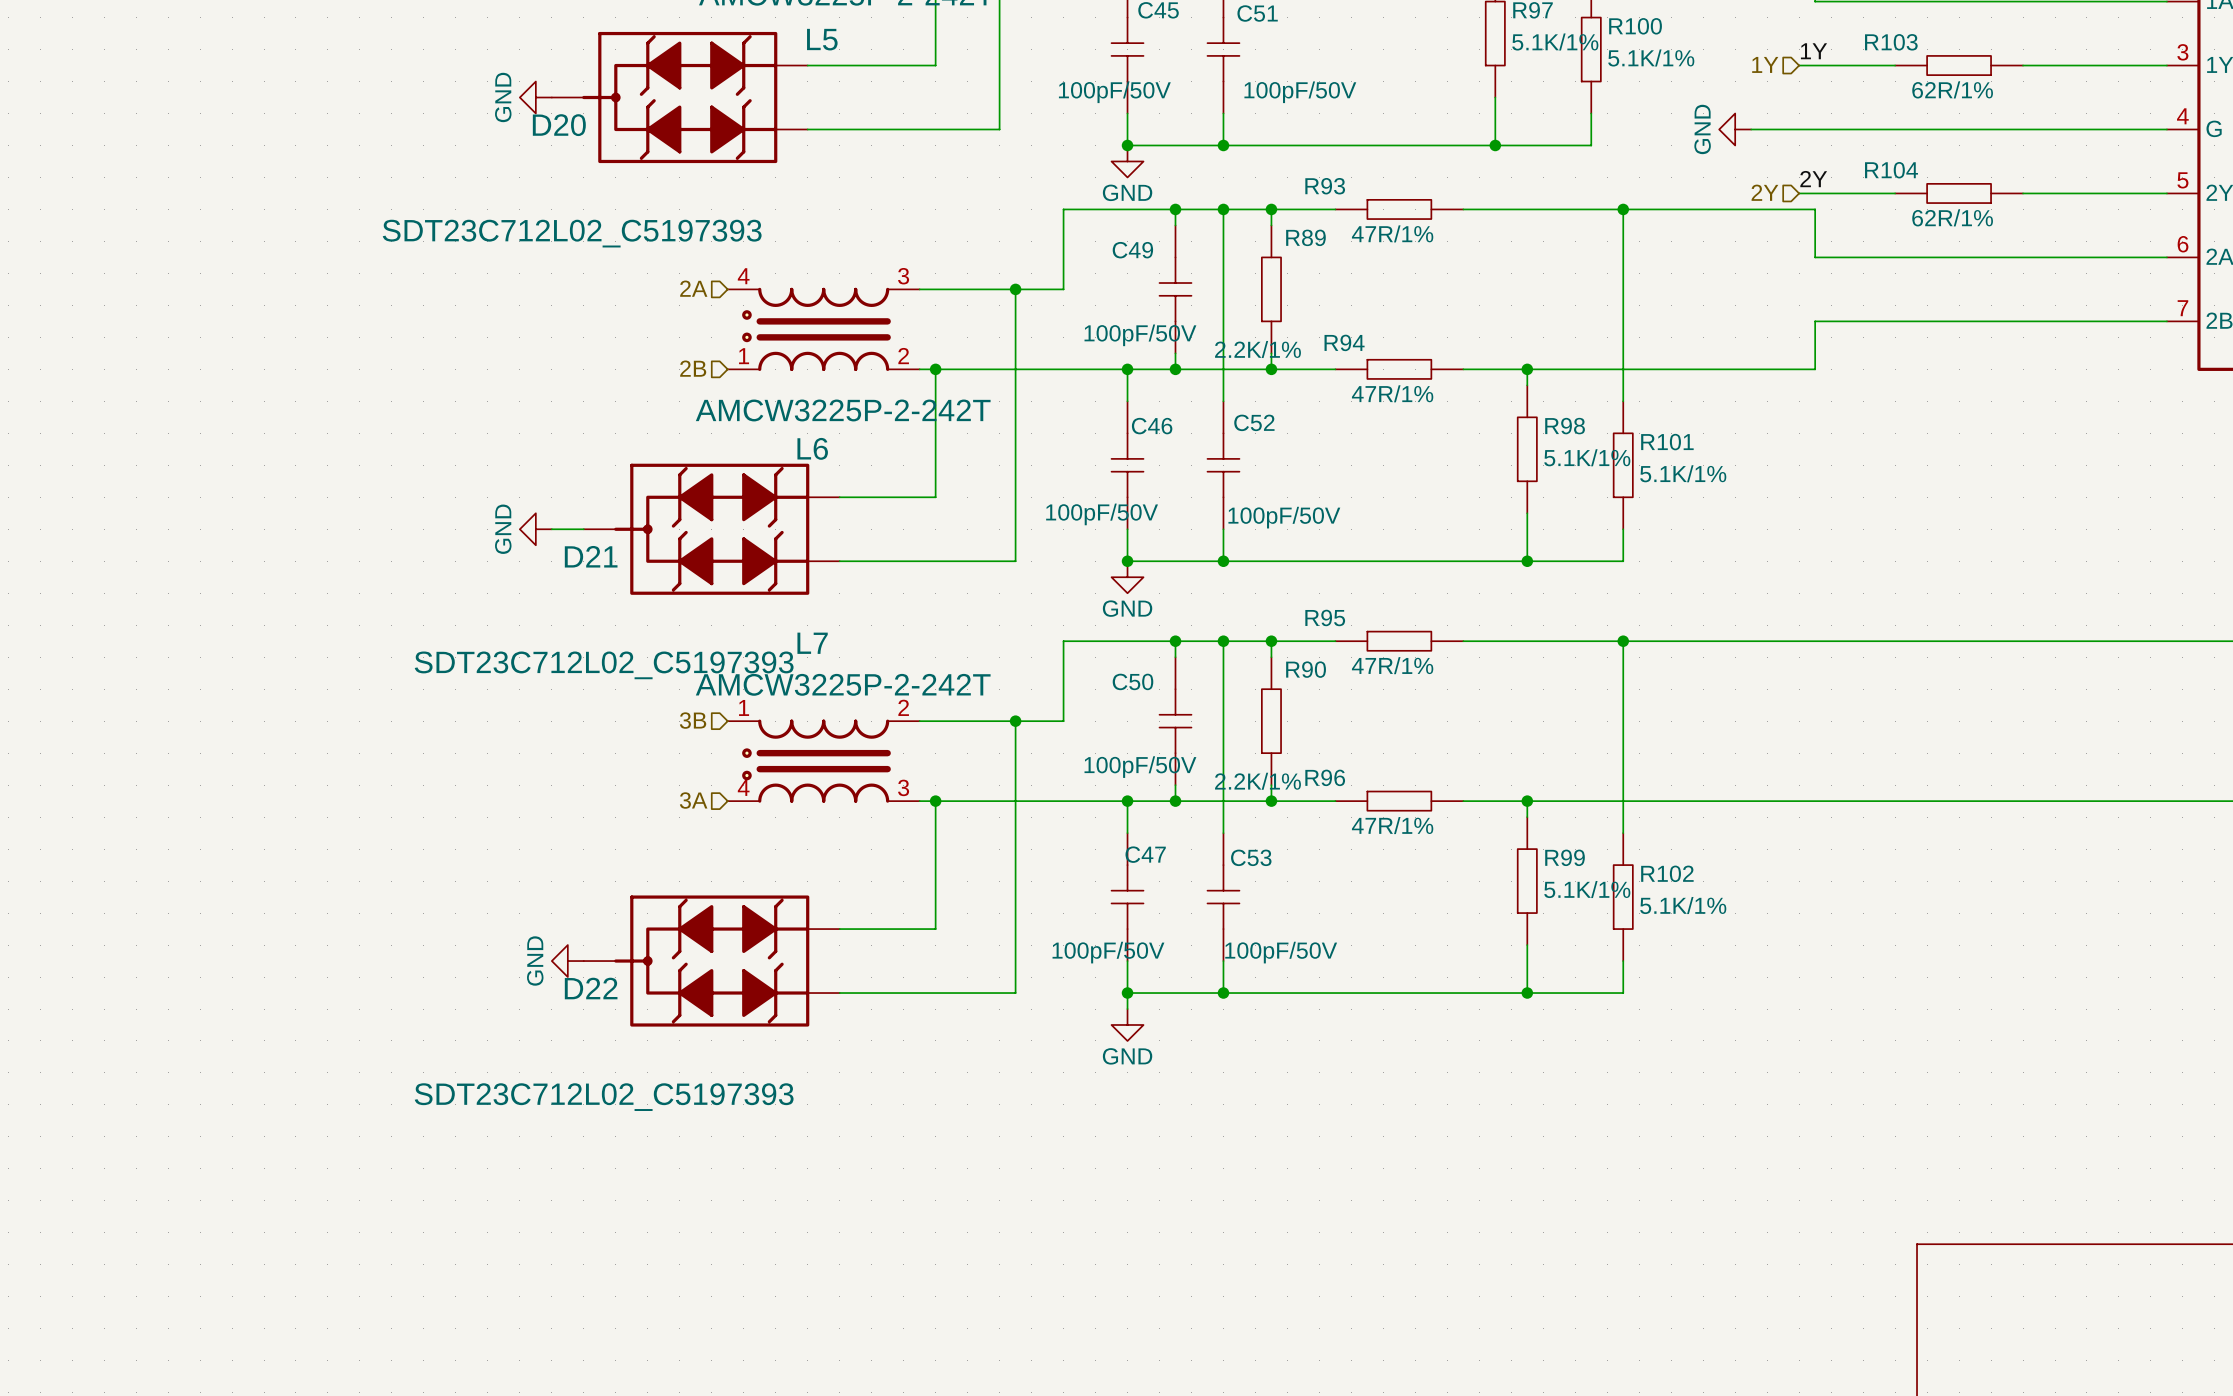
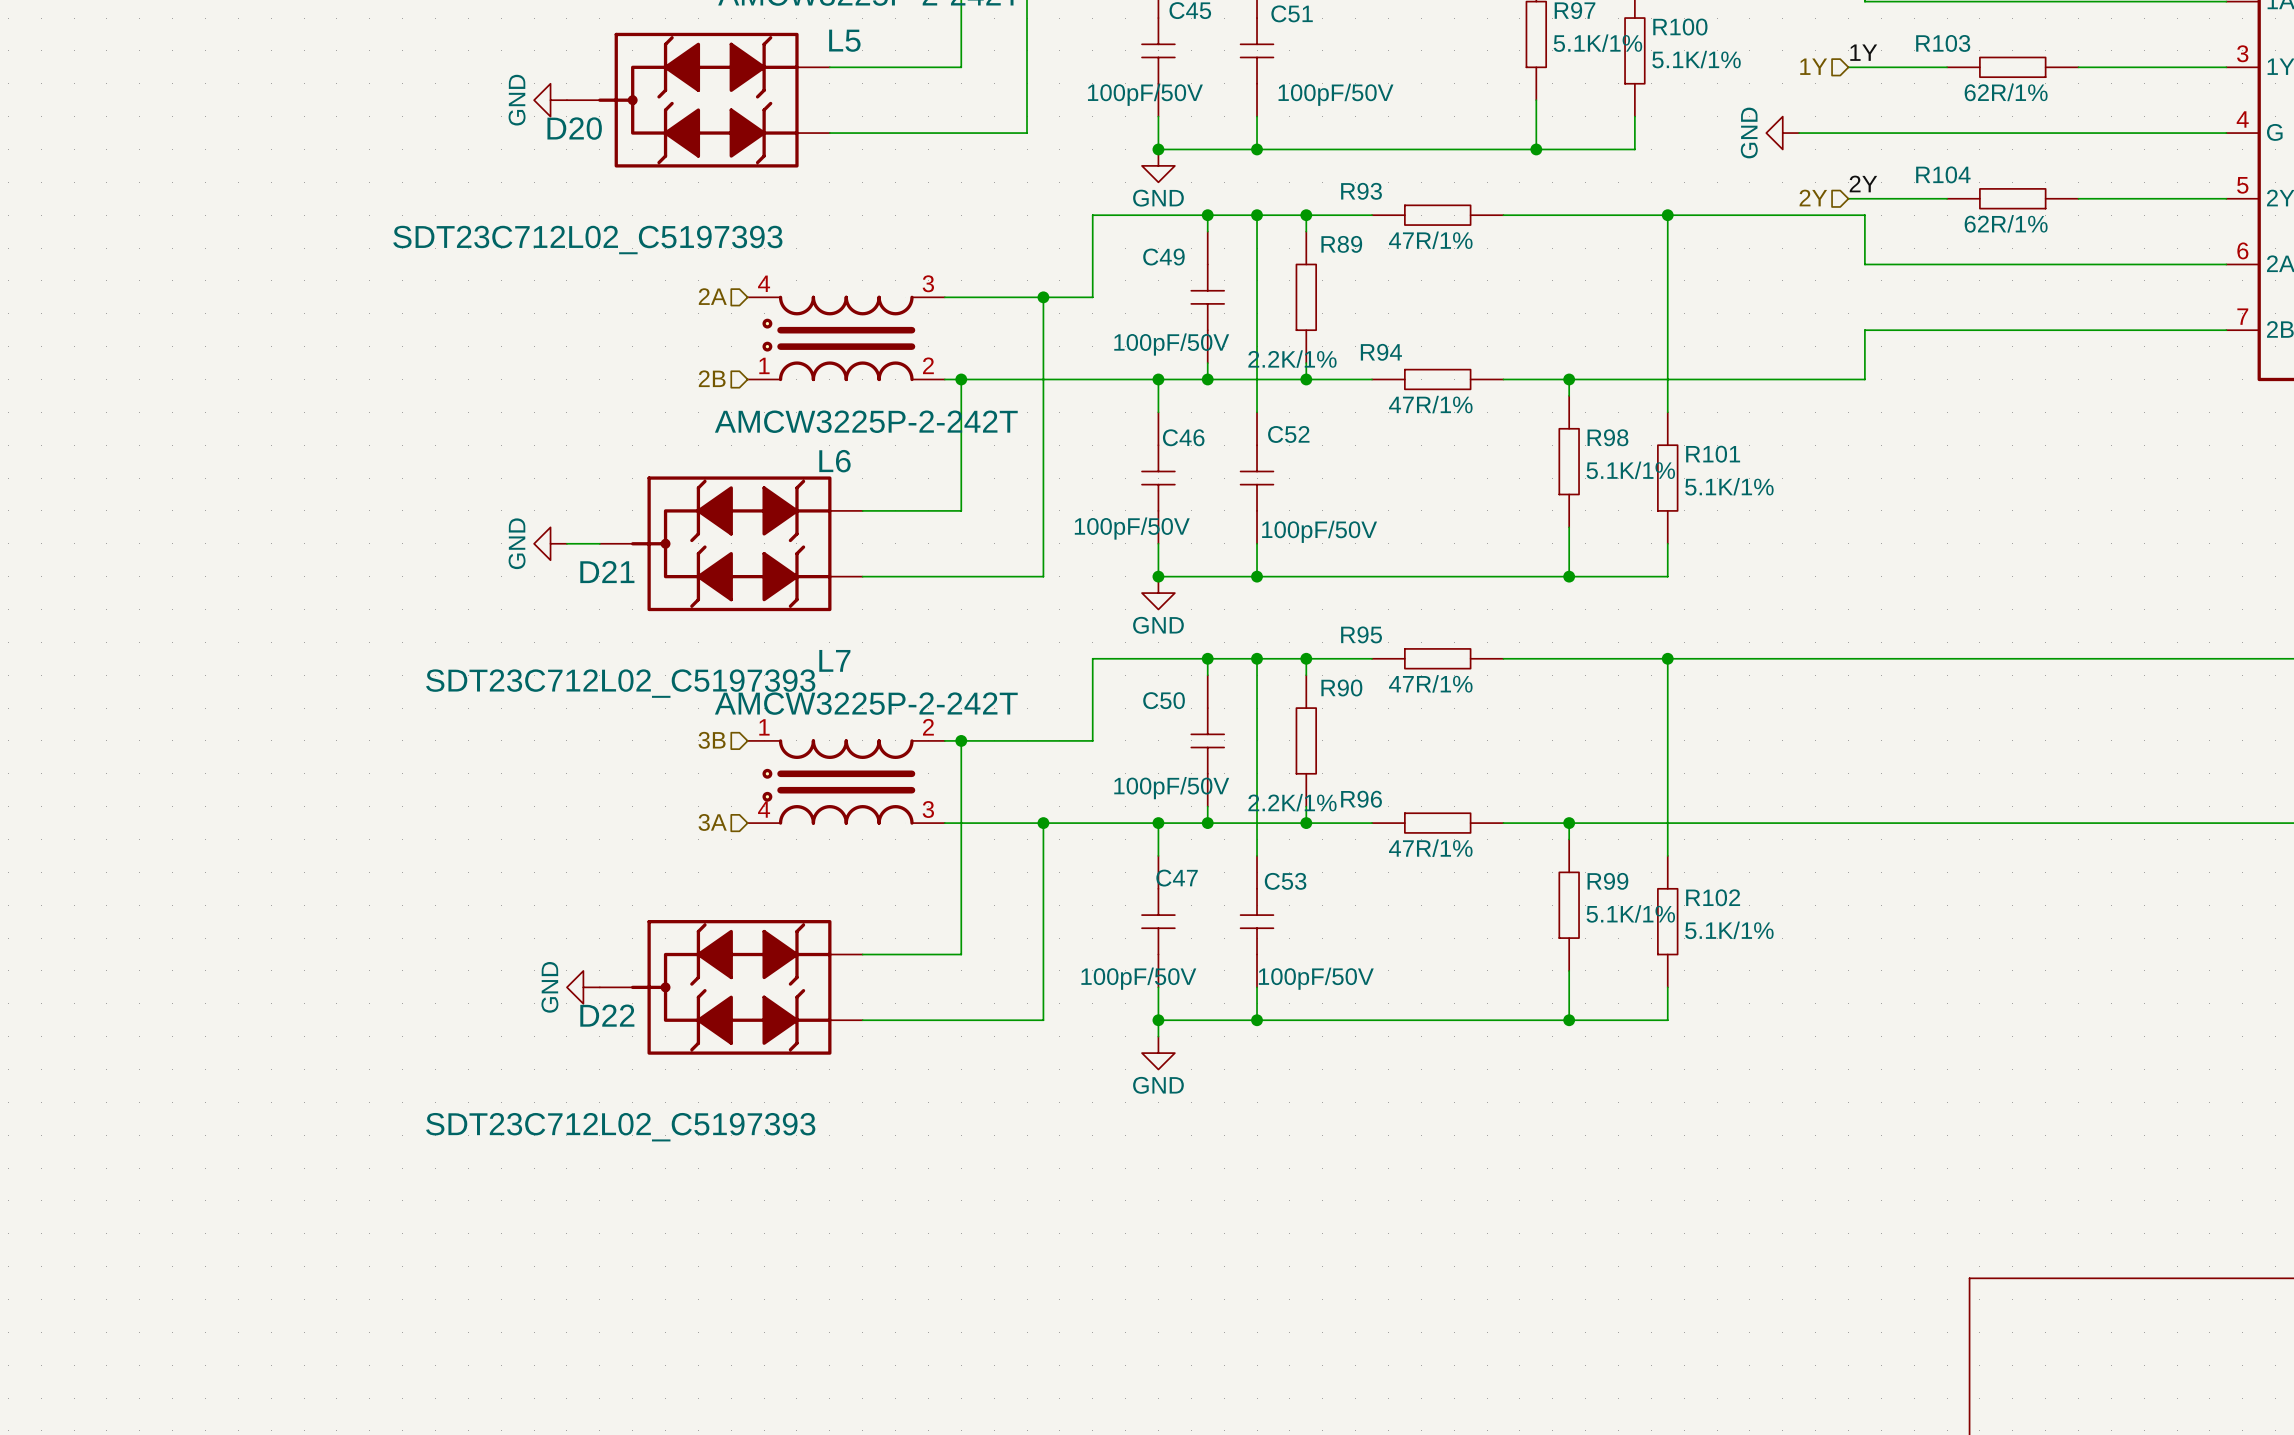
junction: none -> (961, 740)
wire: (1015, 721) (1015, 801) -> (961, 740) (961, 823)
junction: (1015, 721) -> none
junction: (935, 801) -> none
junction: none -> (1043, 823)

